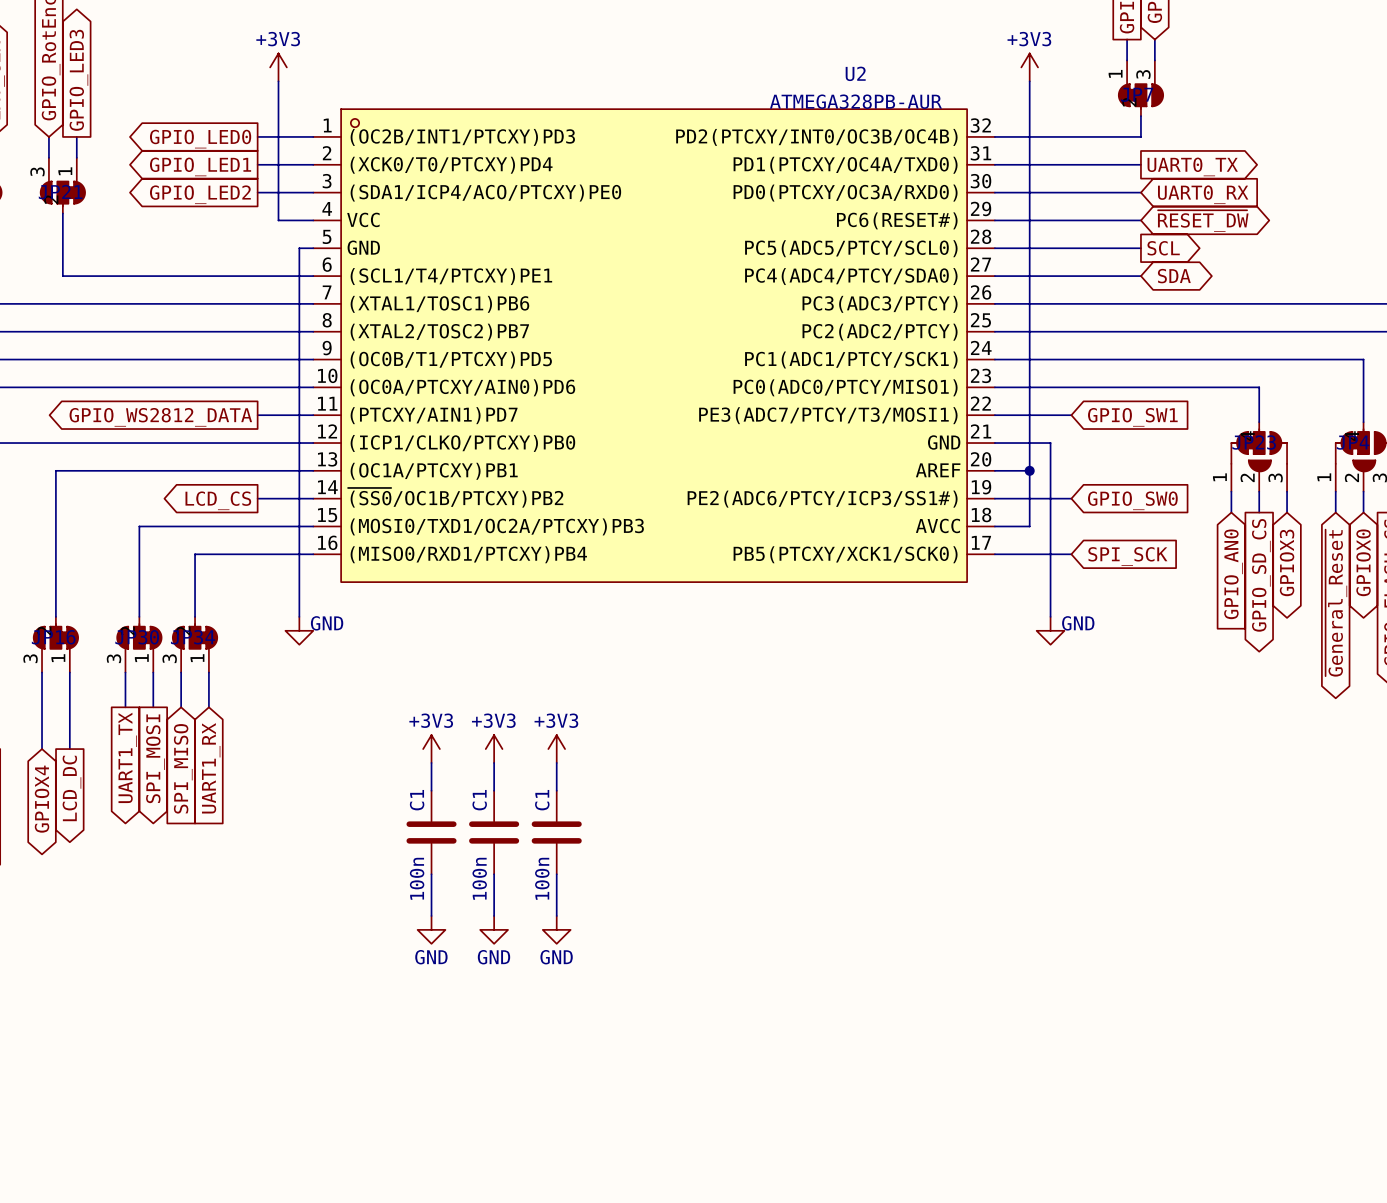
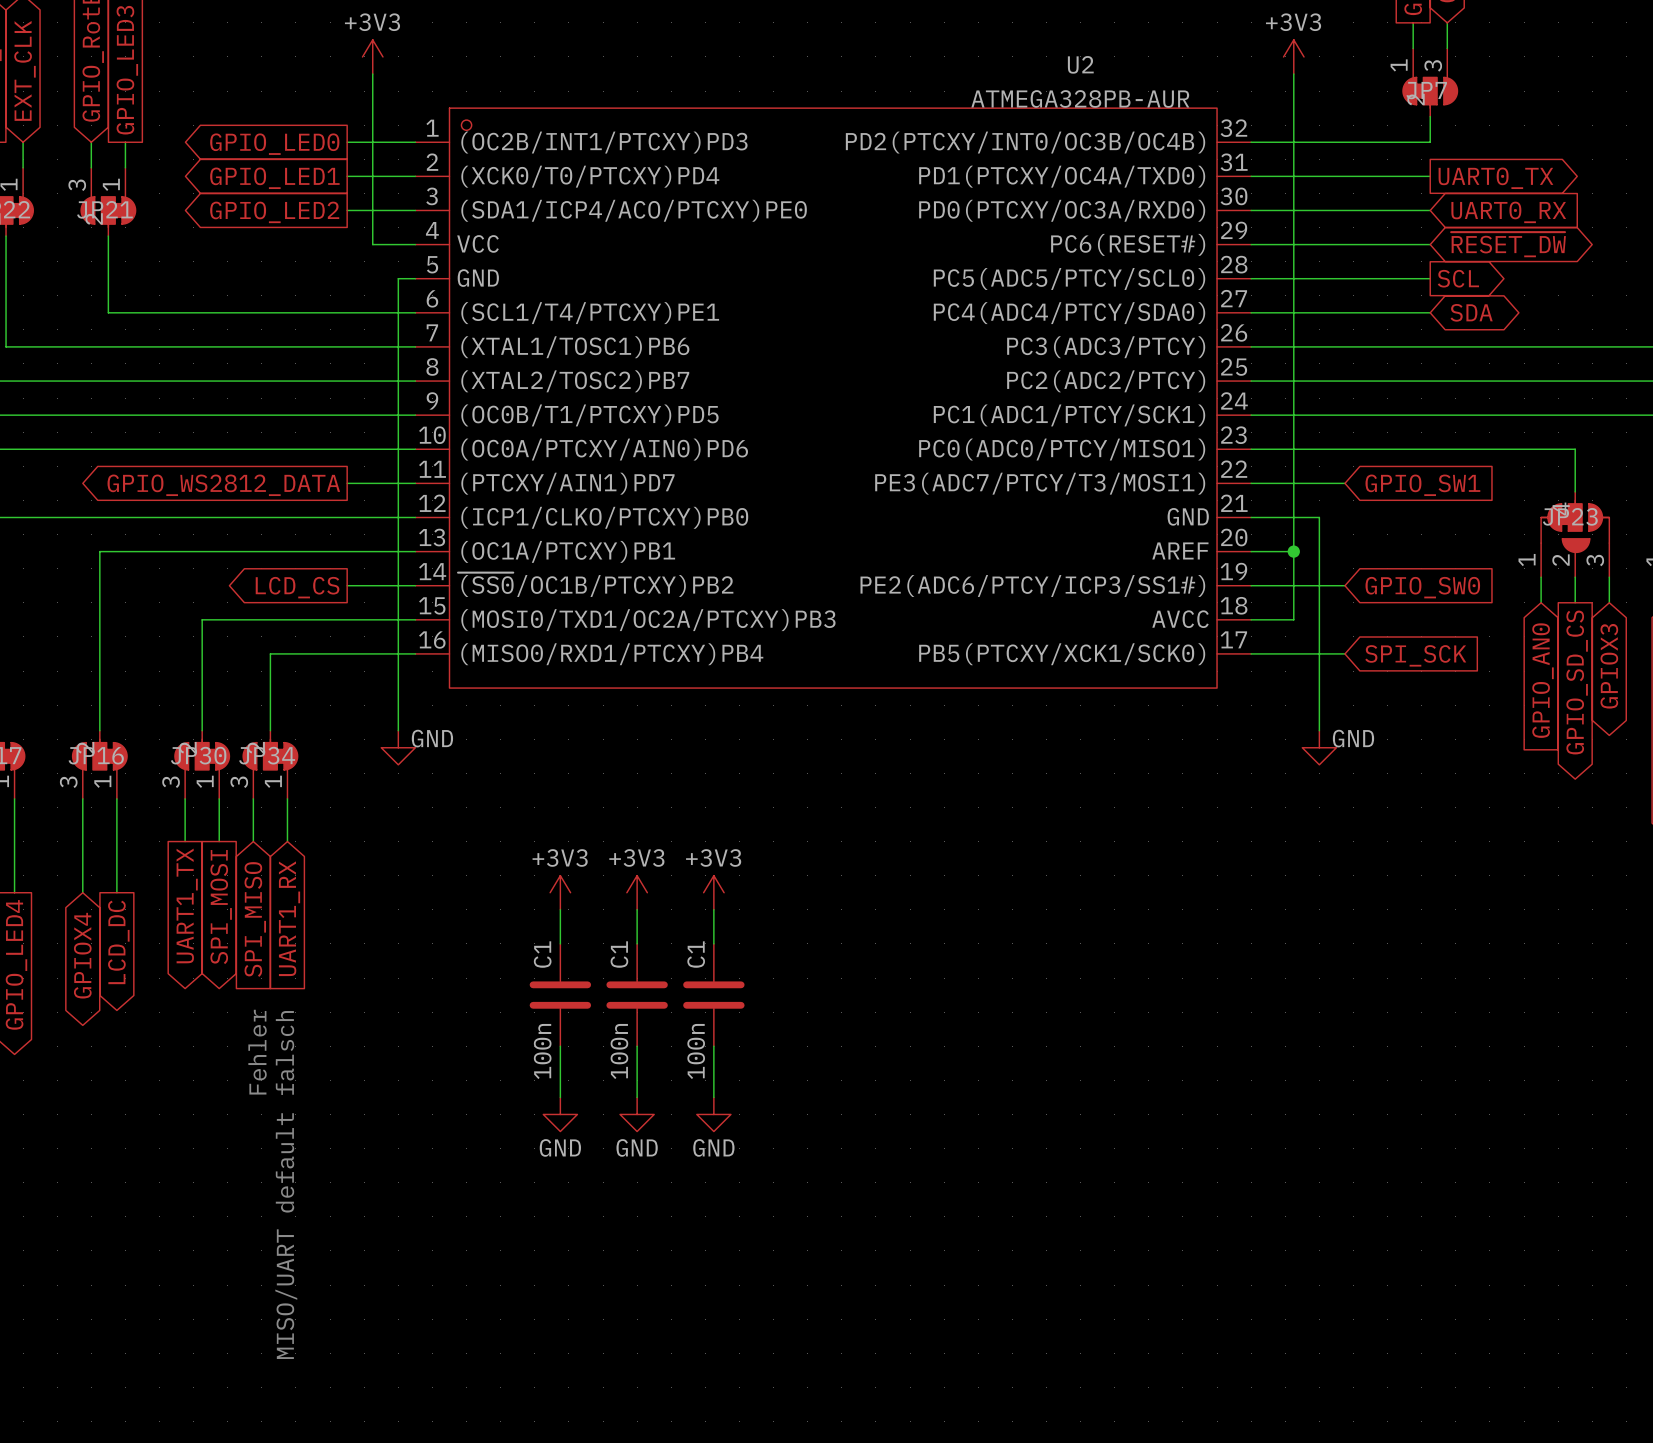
text: none -> Fehler (257, 1052)
text: none -> MISO/UART default falsch (286, 1185)

